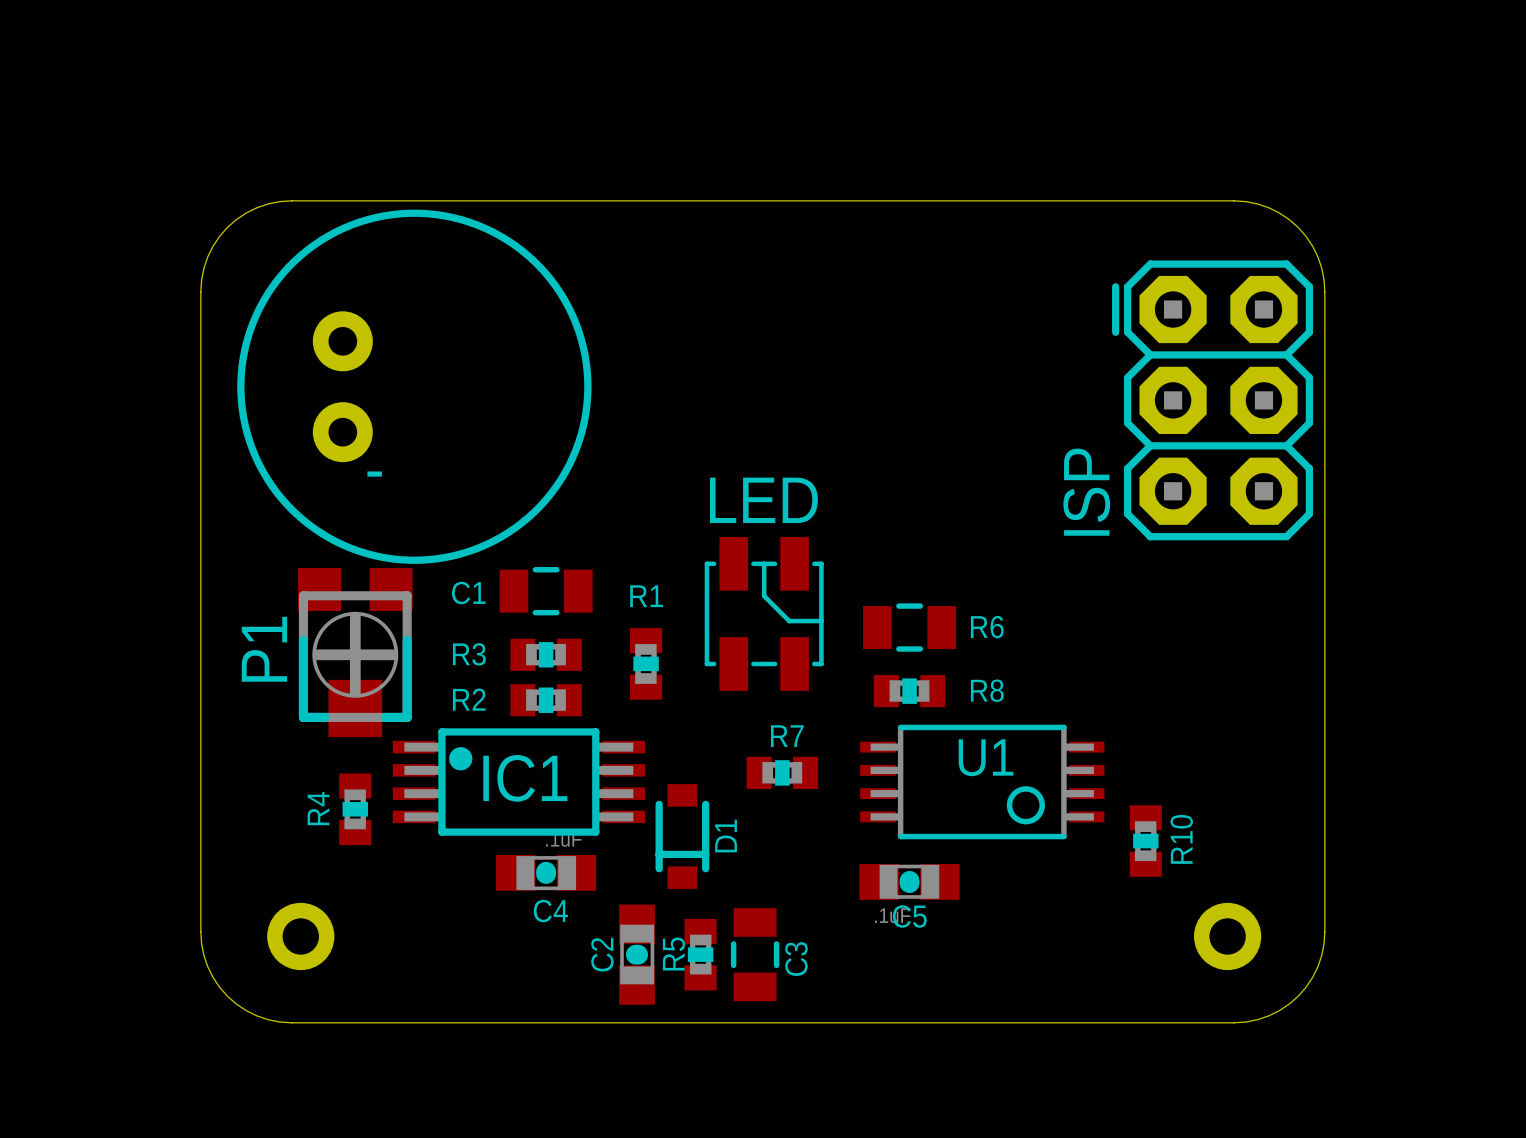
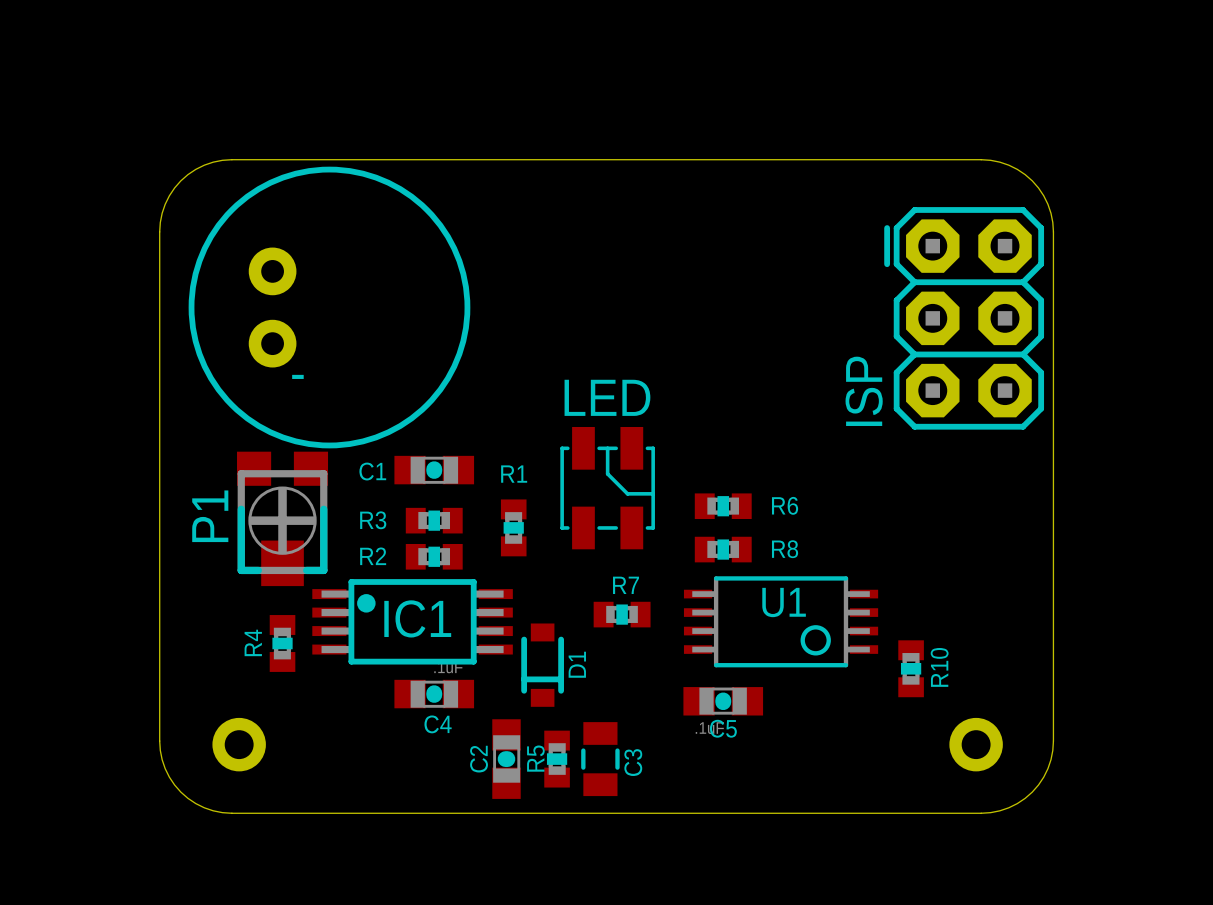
C1 footprint: [499, 567, 593, 616] -> [394, 455, 475, 485]
R6 footprint: [863, 603, 957, 652] -> [694, 493, 752, 520]

